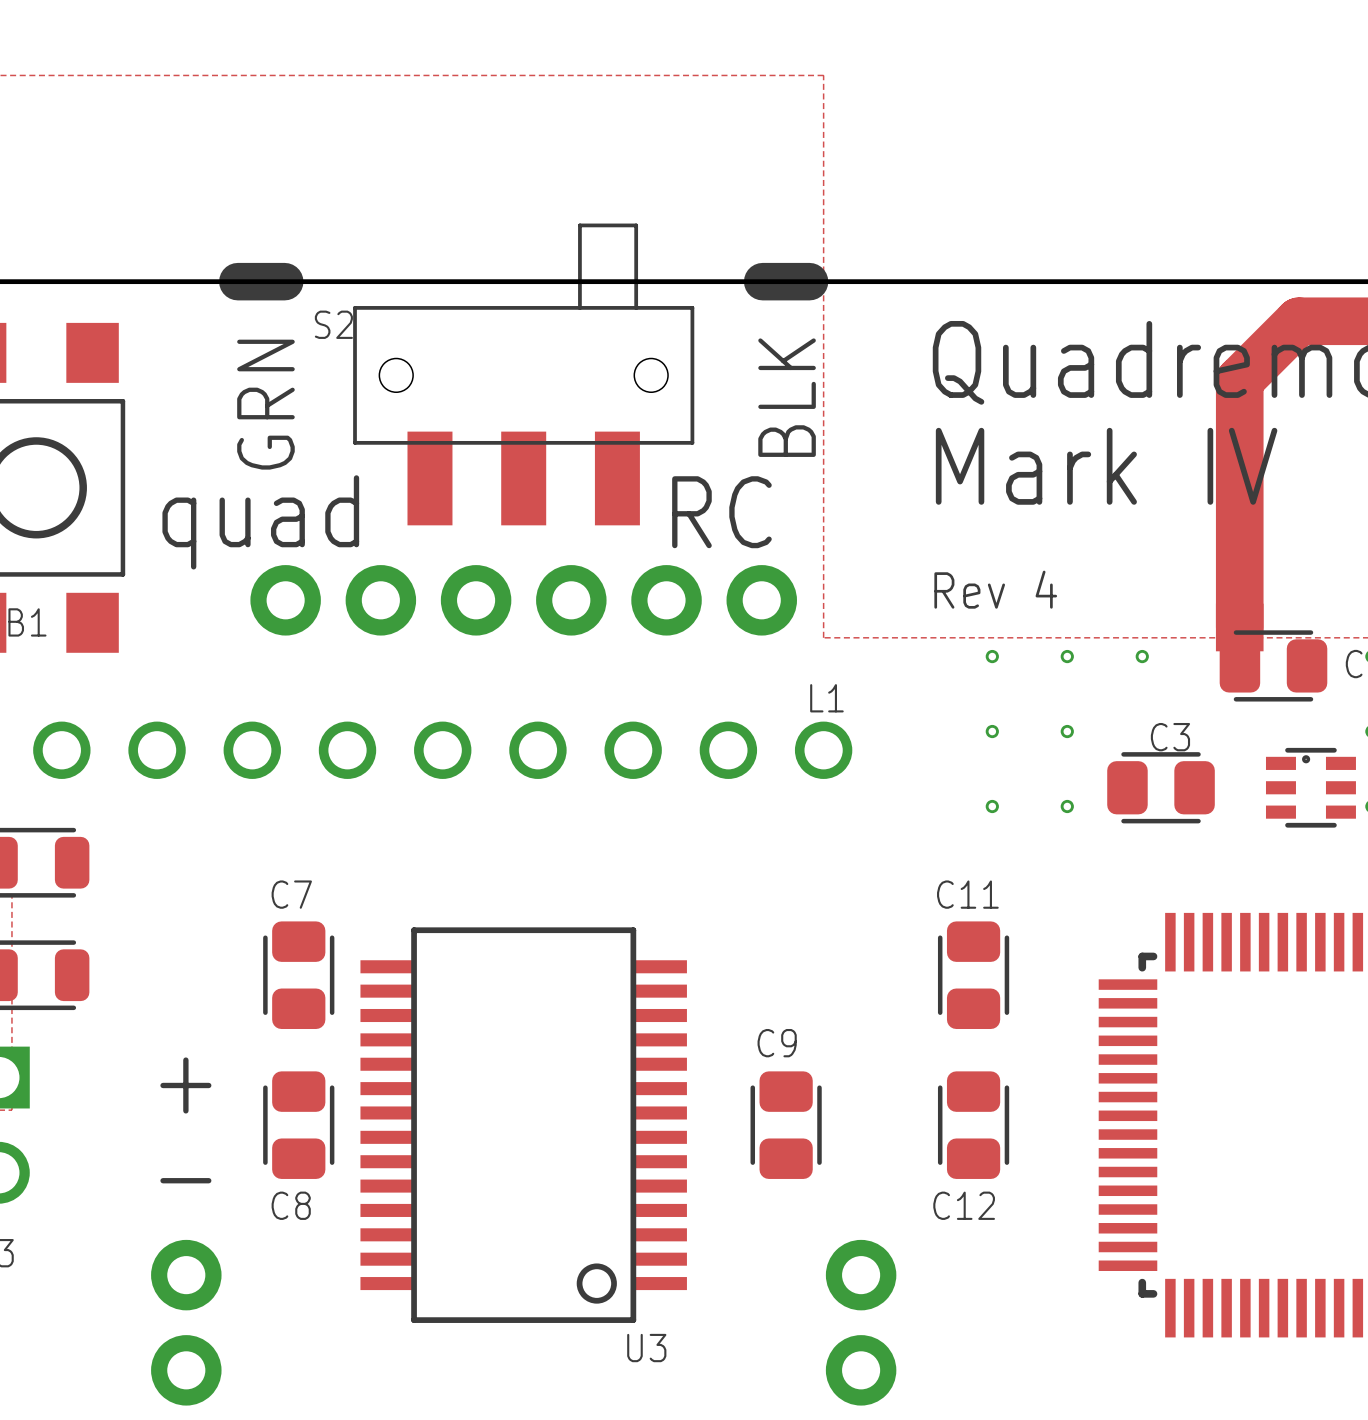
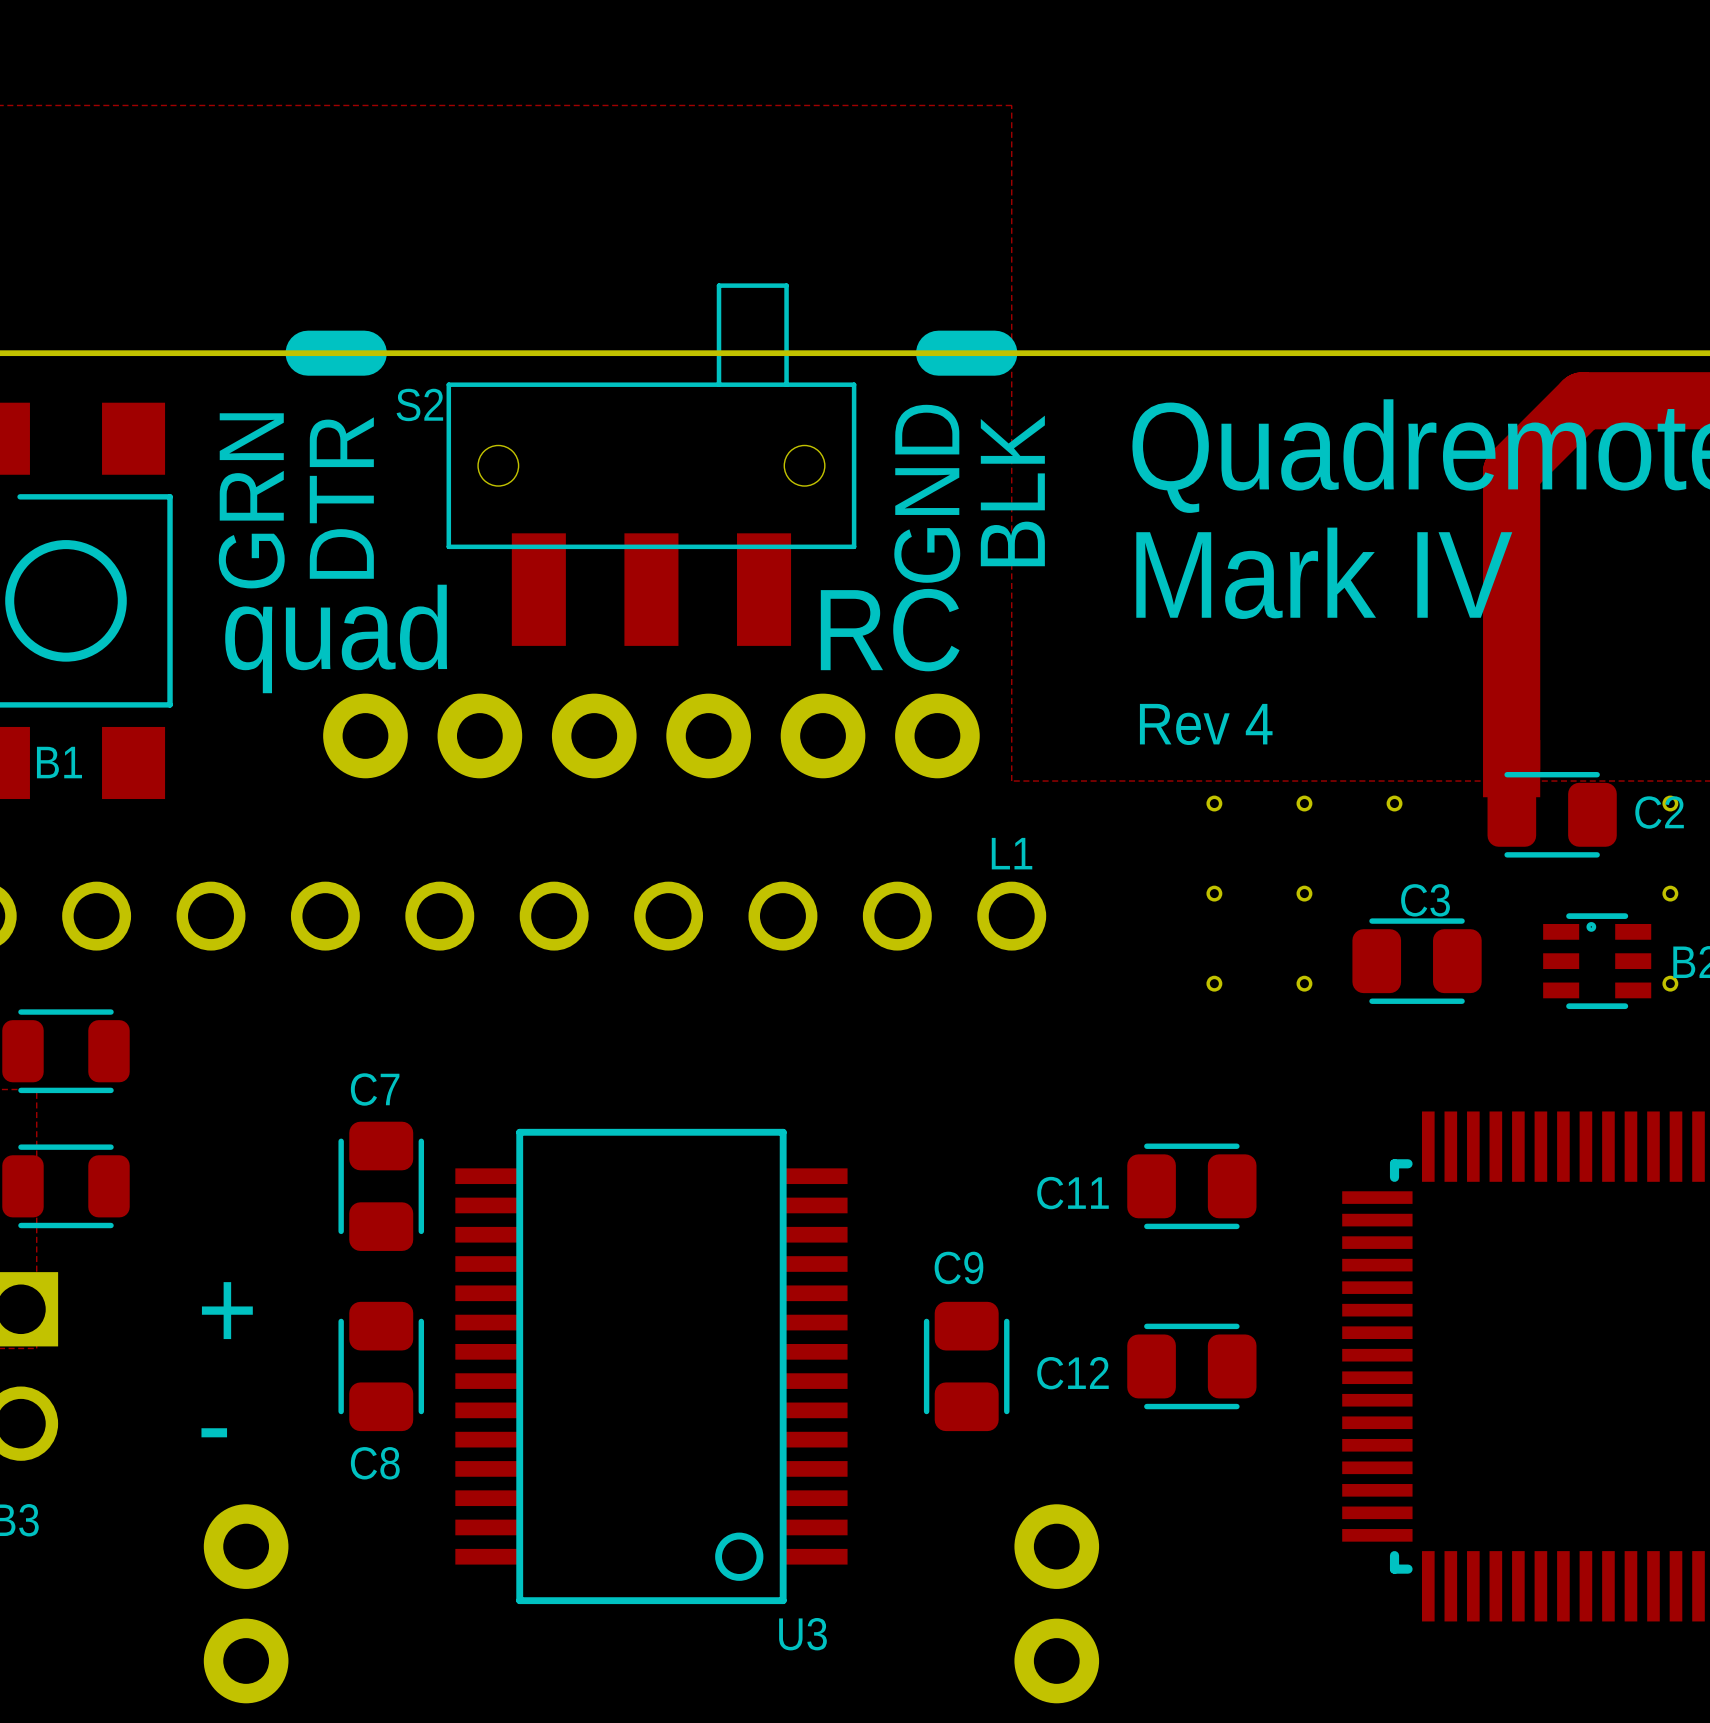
text position: BLK (787, 397) -> BLK (1012, 490)
text: none -> GND (927, 493)
text: none -> GRN (251, 500)
text: GRN (265, 404) -> DTR (341, 498)
C11 name position: C11 (967, 894) -> C11 (1073, 1193)
C11 rotation: 0° (973, 975) -> 90° clockwise (1191, 1186)
C12 rotation: 0° (973, 1125) -> 90° clockwise (1191, 1366)

